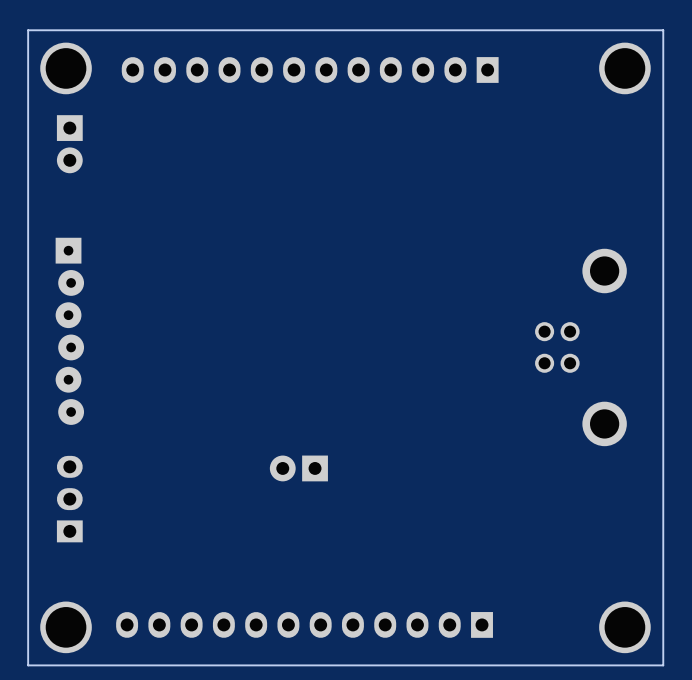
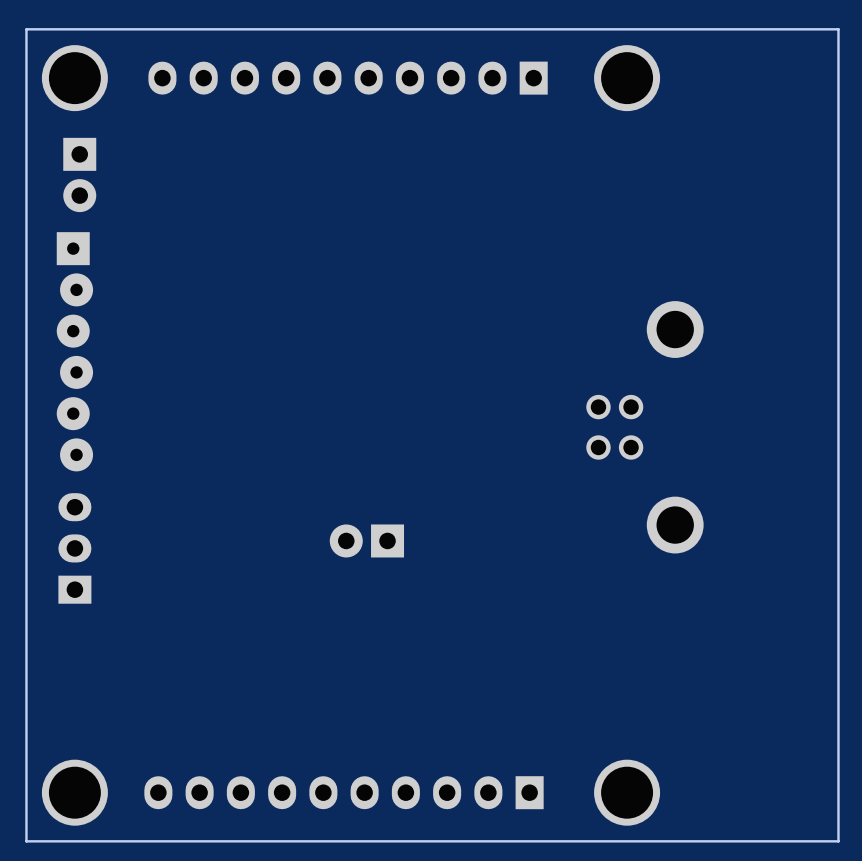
part: none -> (348, 78)
part position: (624, 68) -> (627, 78)
part: (310, 69) -> none
part position: (69, 331) -> (74, 351)
part position: (580, 347) -> (644, 427)
part position: (298, 468) -> (366, 540)
part position: (69, 499) -> (74, 548)
part: (304, 624) -> none
part: none -> (344, 792)
part position: (624, 627) -> (627, 792)

